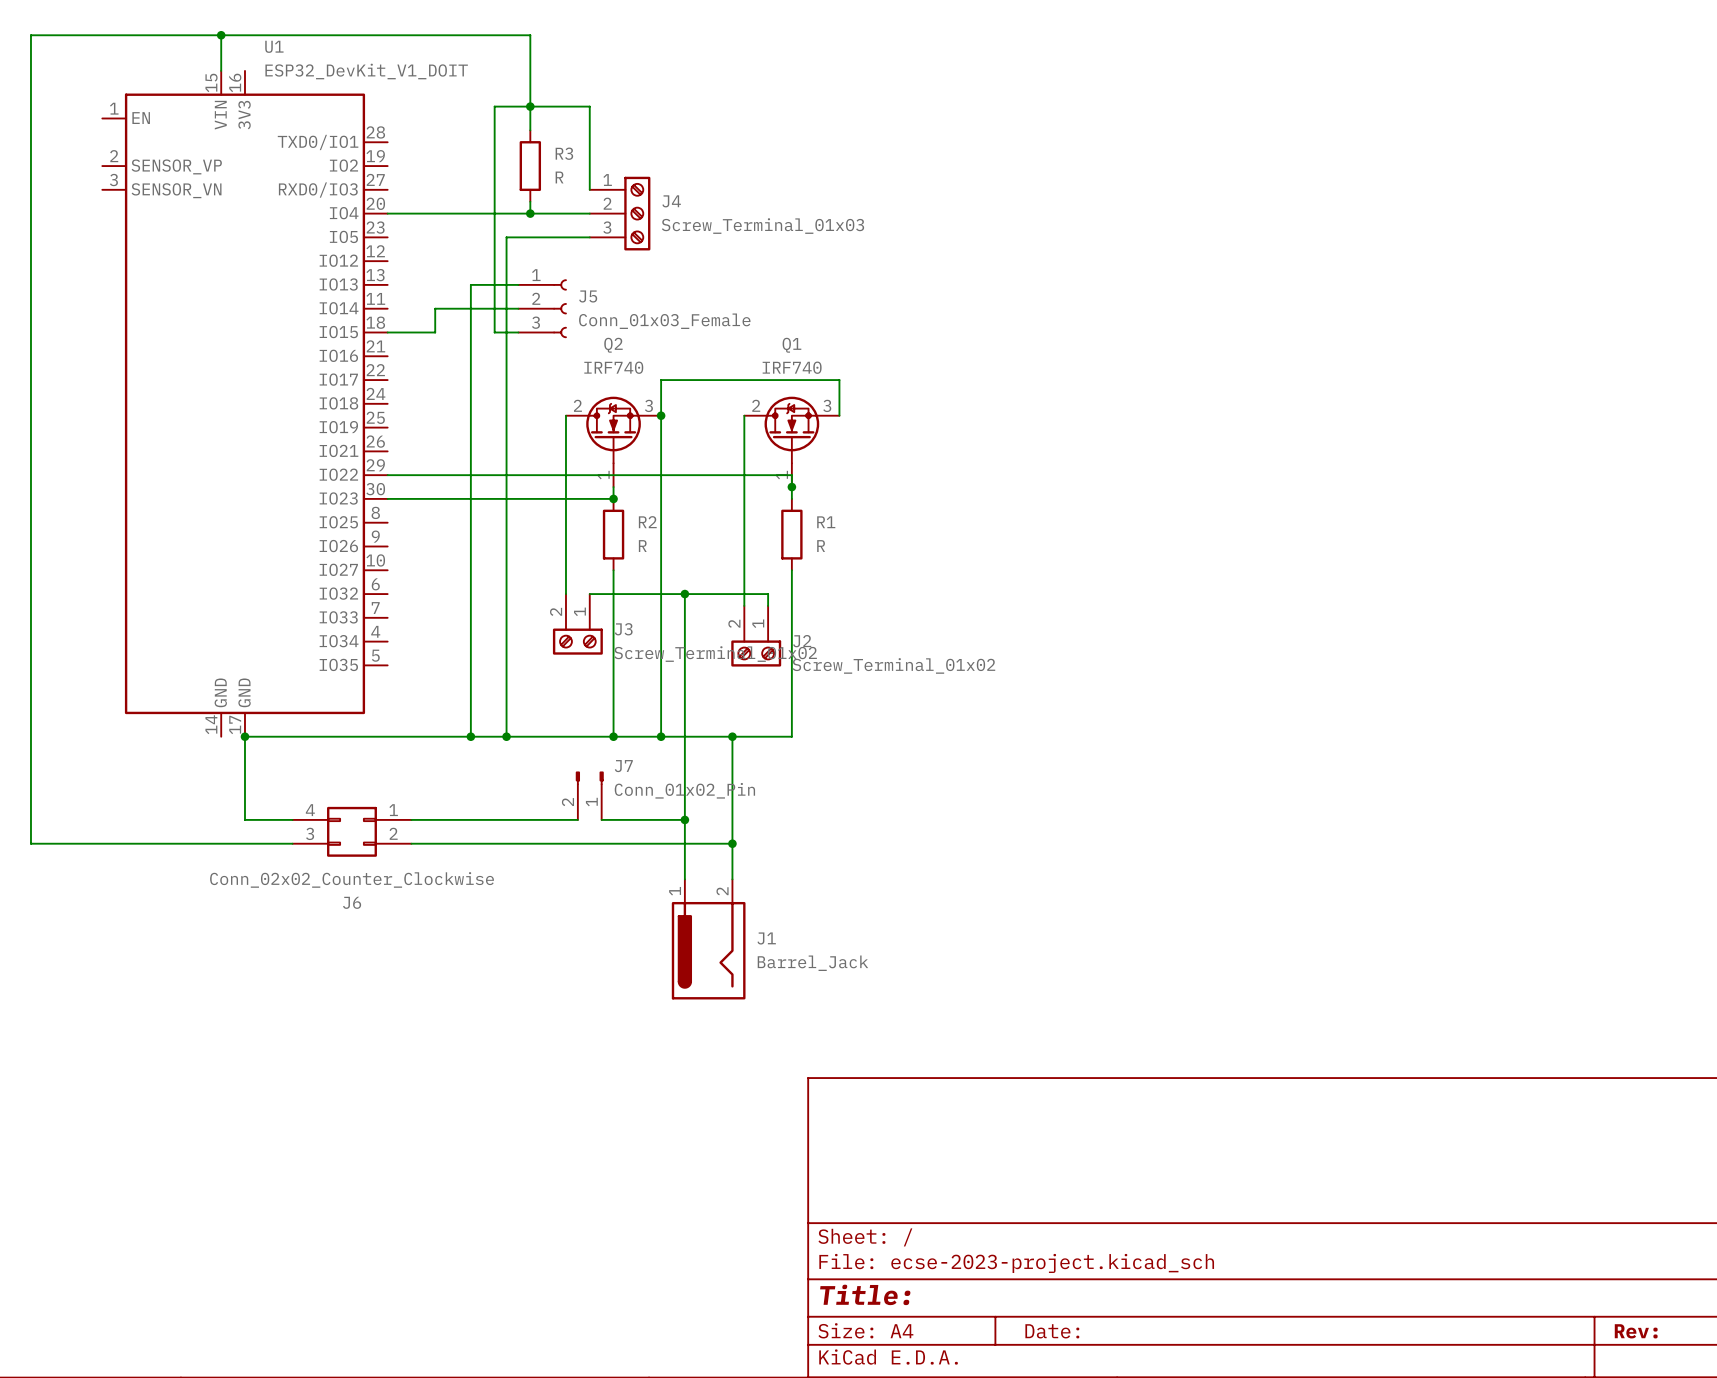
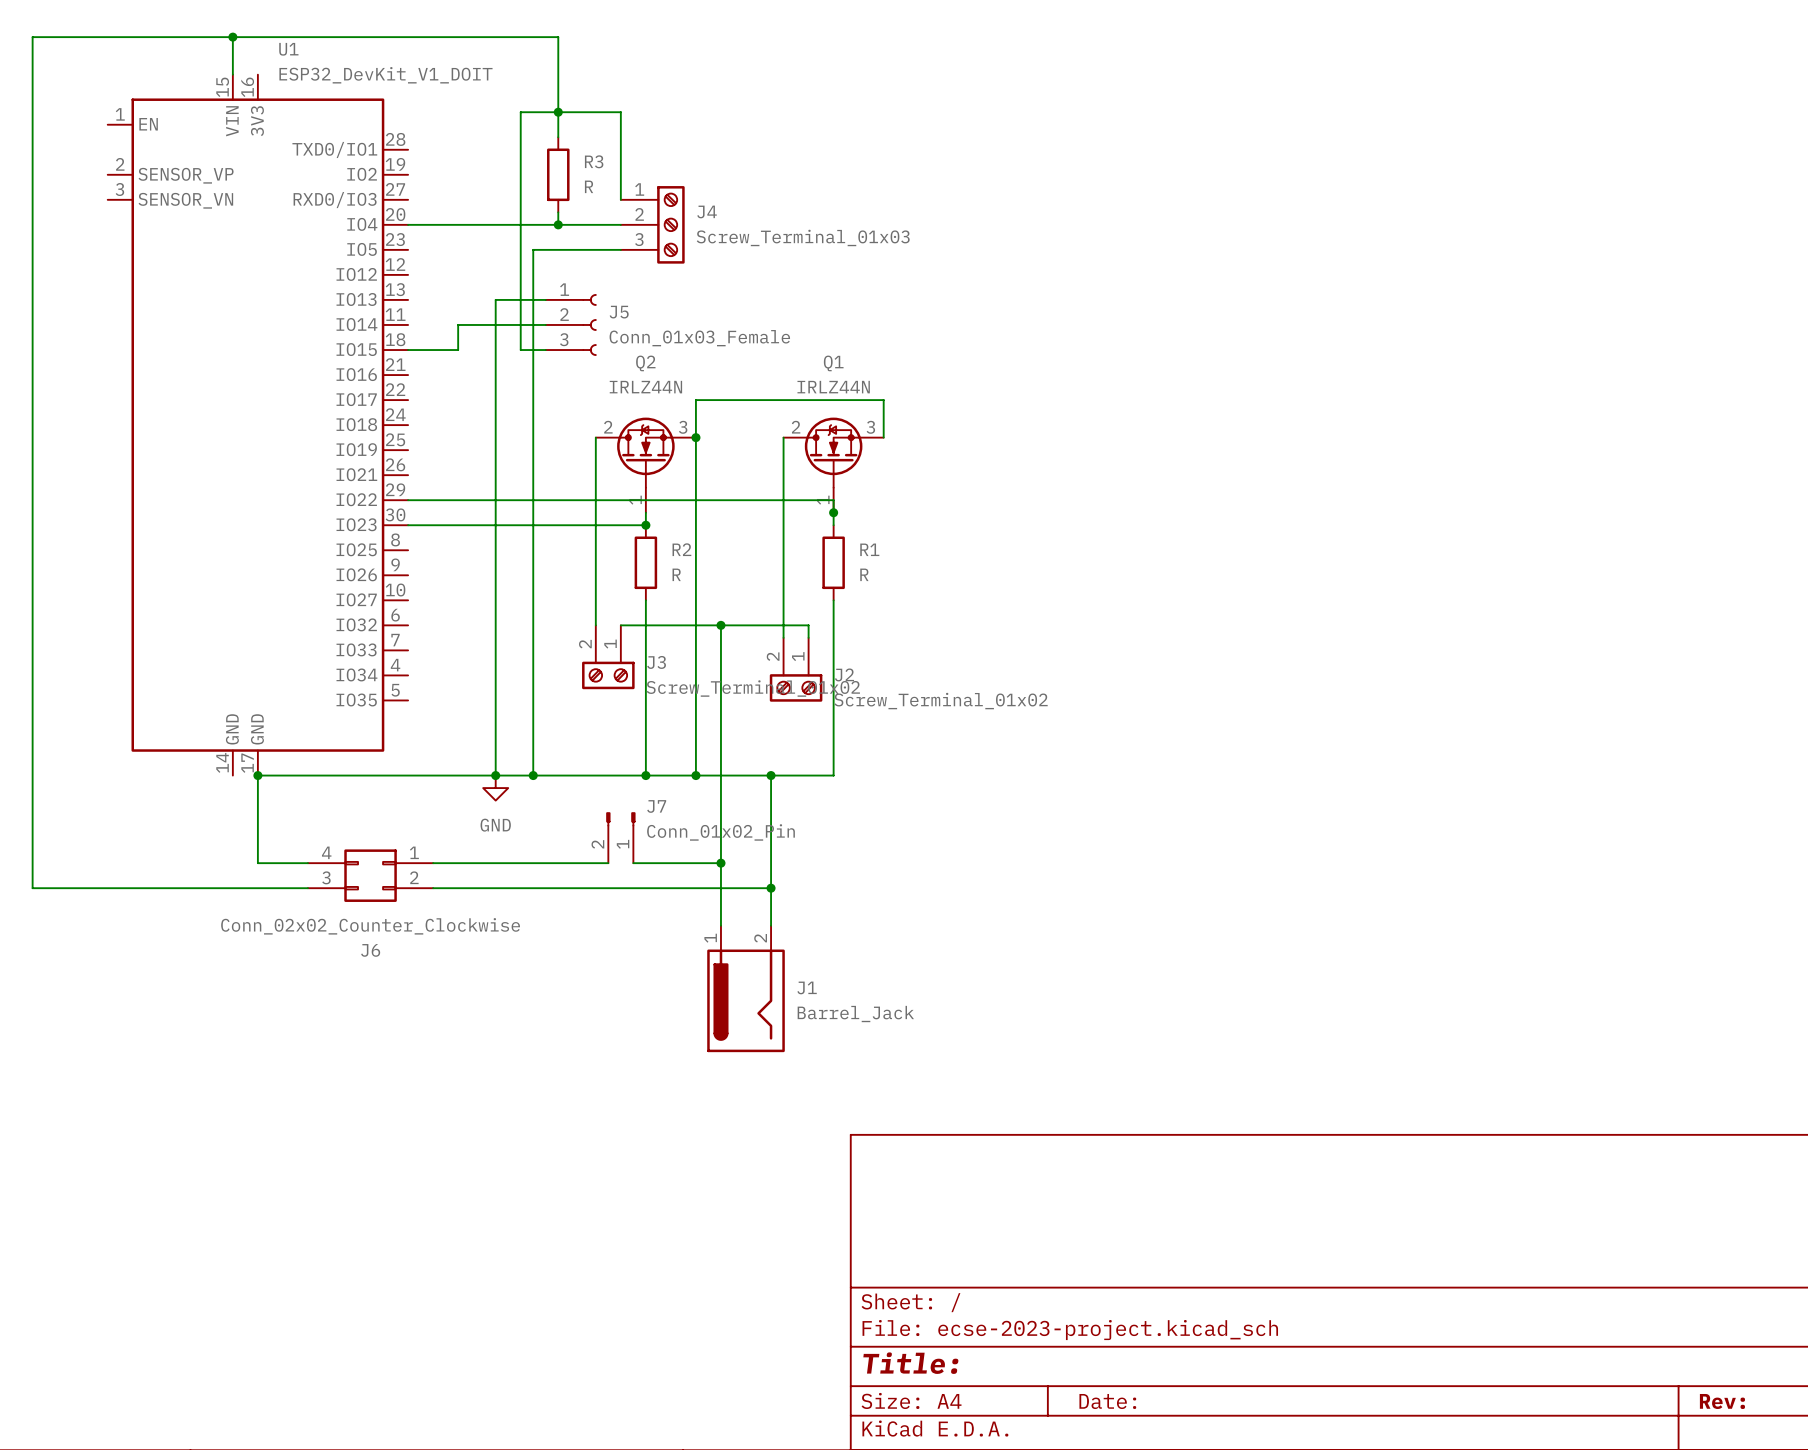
Q2 value: IRF740 (613, 367) -> IRLZ44N (645, 387)
Q1 value: IRF740 (792, 367) -> IRLZ44N (833, 387)
power symbol: none -> GND (495, 788)

